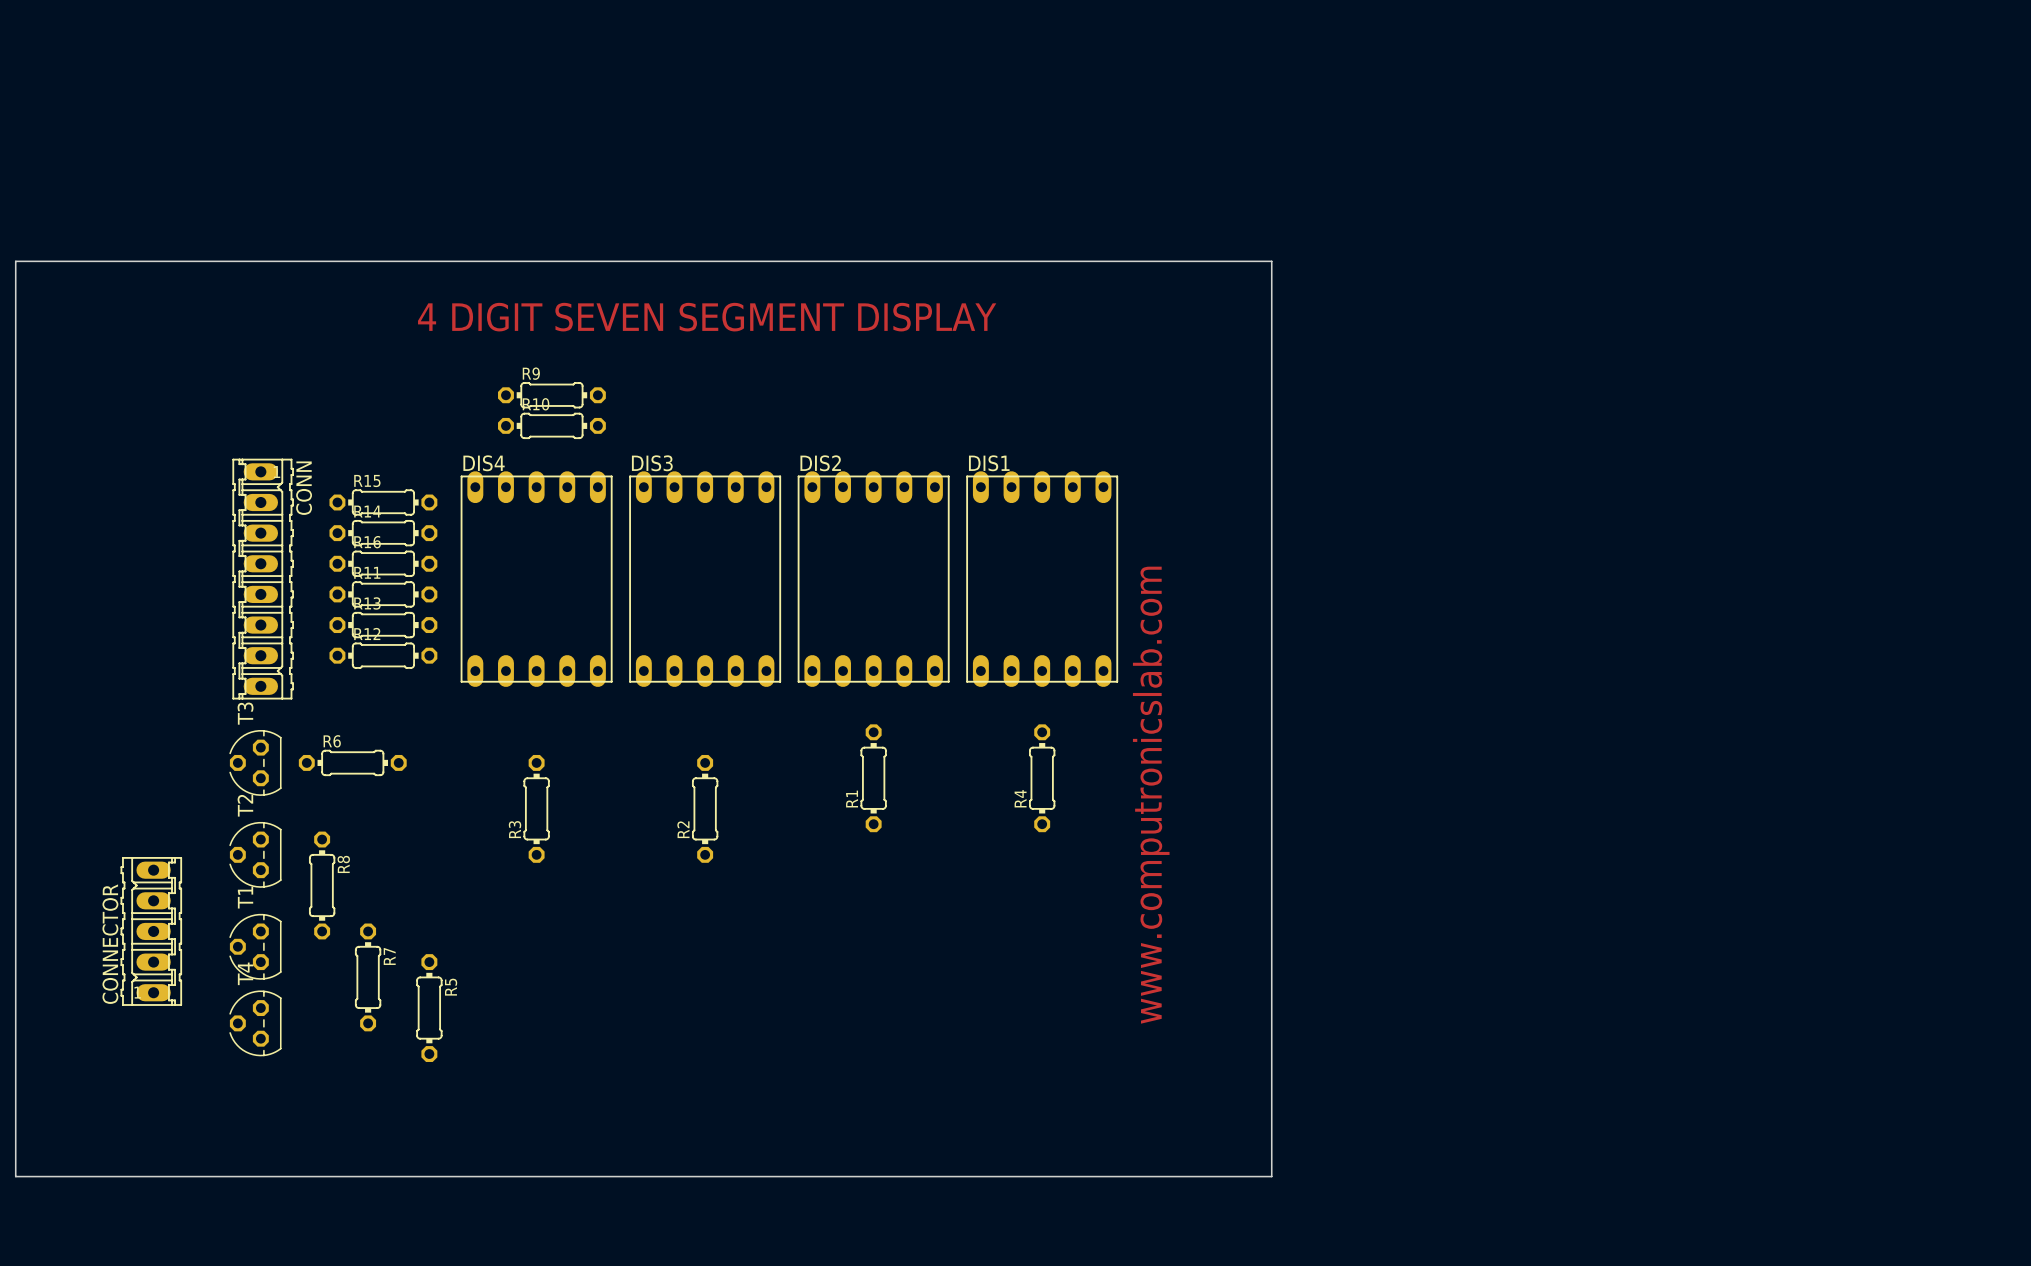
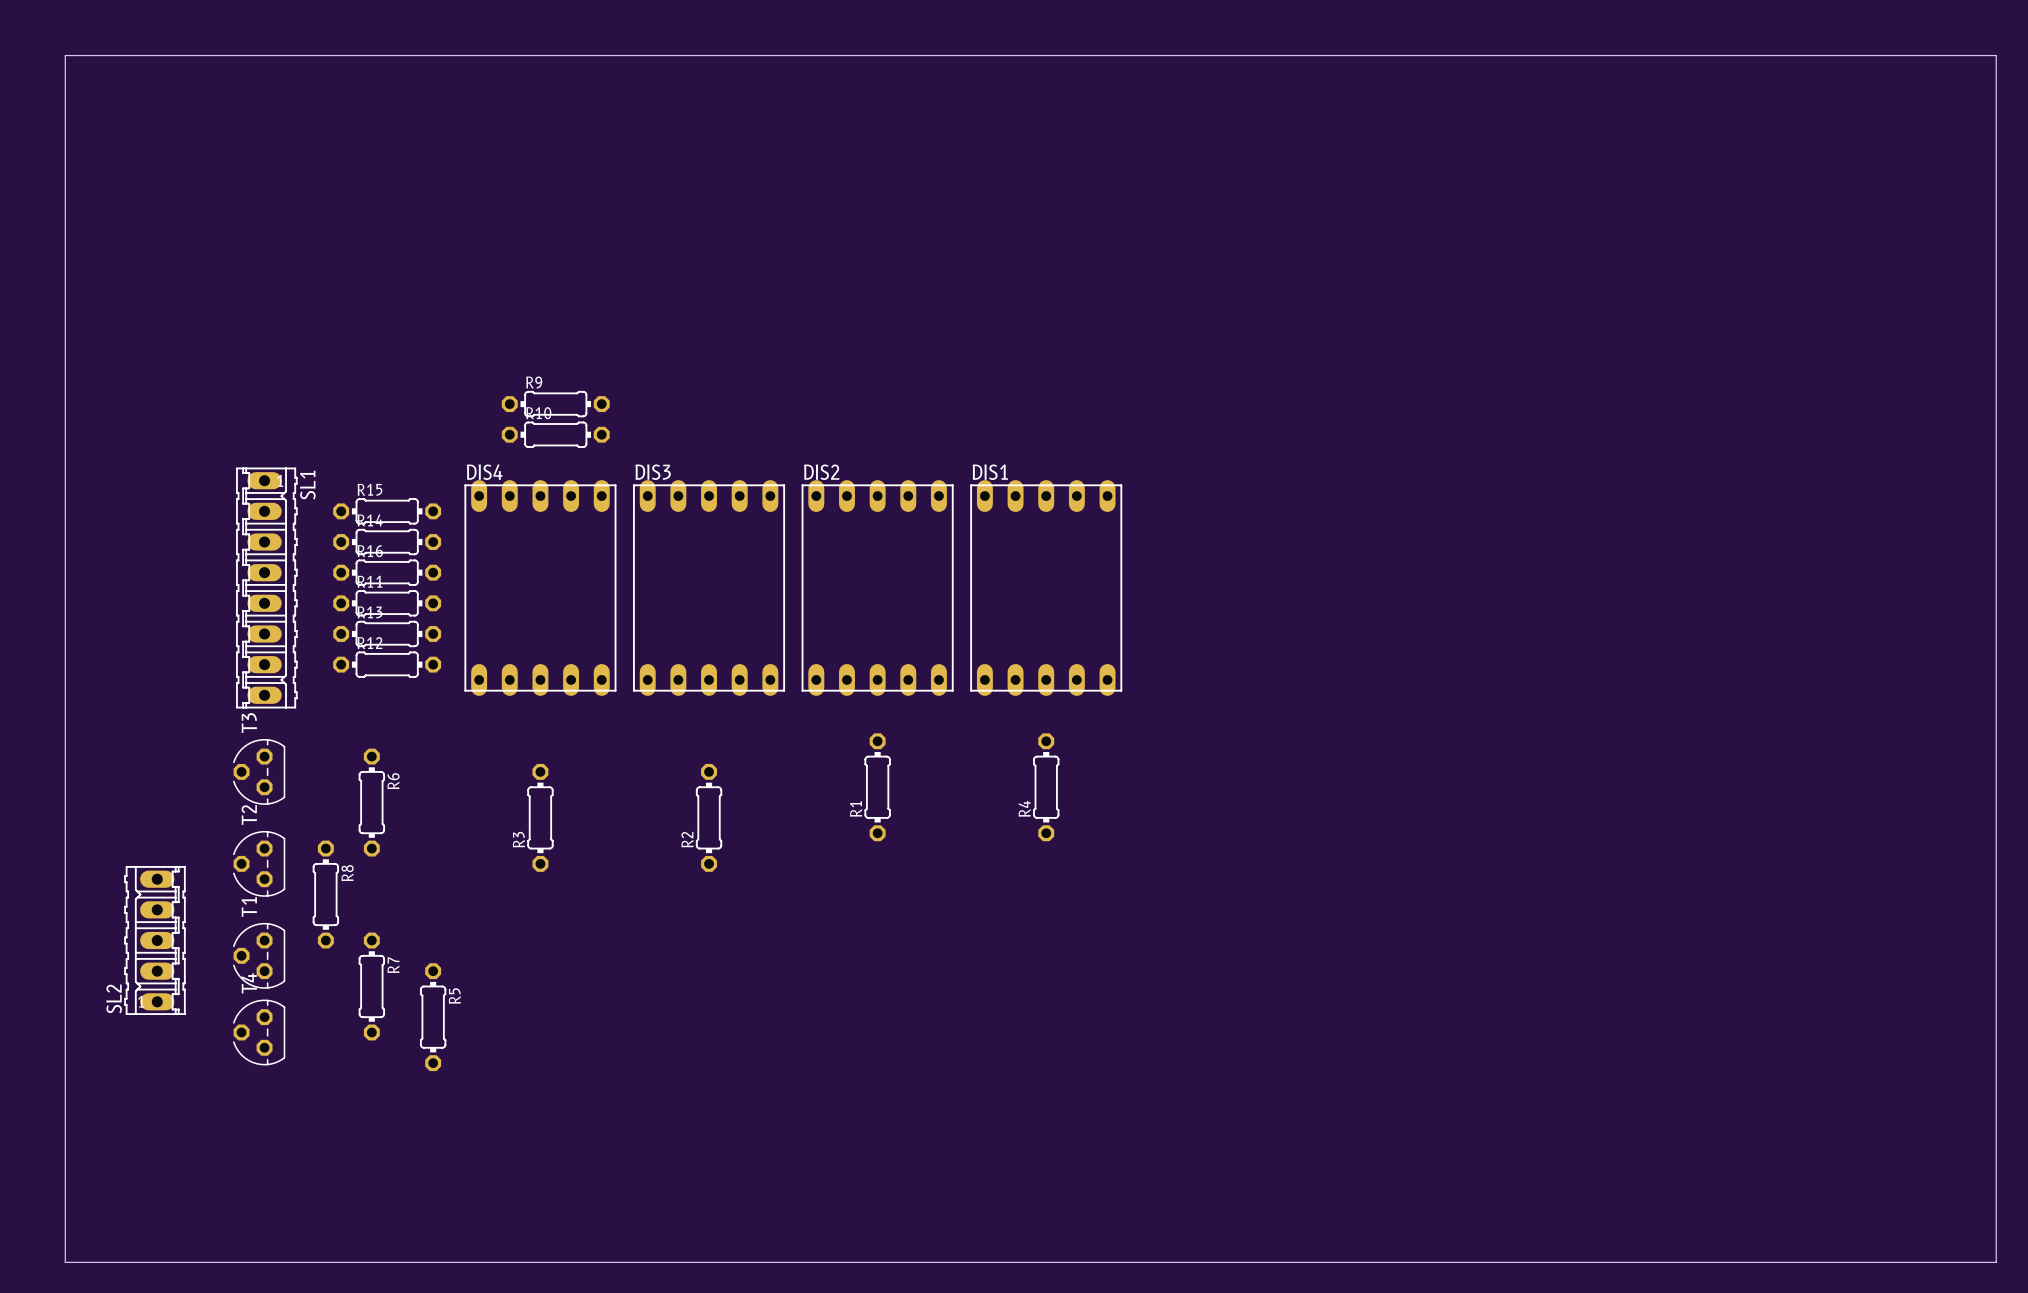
board edge: none -> (65, 55) (1996, 55) (1996, 1262) (65, 1262) (65, 55)
board edge: (15, 261) (1271, 261) (1271, 1176) (15, 1176) (15, 261) -> none
text: 4 DIGIT SEVEN SEGMENT DISPLAY (707, 317) -> none
CONN name: CONN (304, 488) -> SL1 (307, 485)
R6 rotation: 0° (352, 762) -> 90° clockwise (371, 802)
text: www.computronicslab.com (1151, 795) -> none
CONNECTOR name: CONNECTOR (110, 944) -> SL2 (114, 998)

